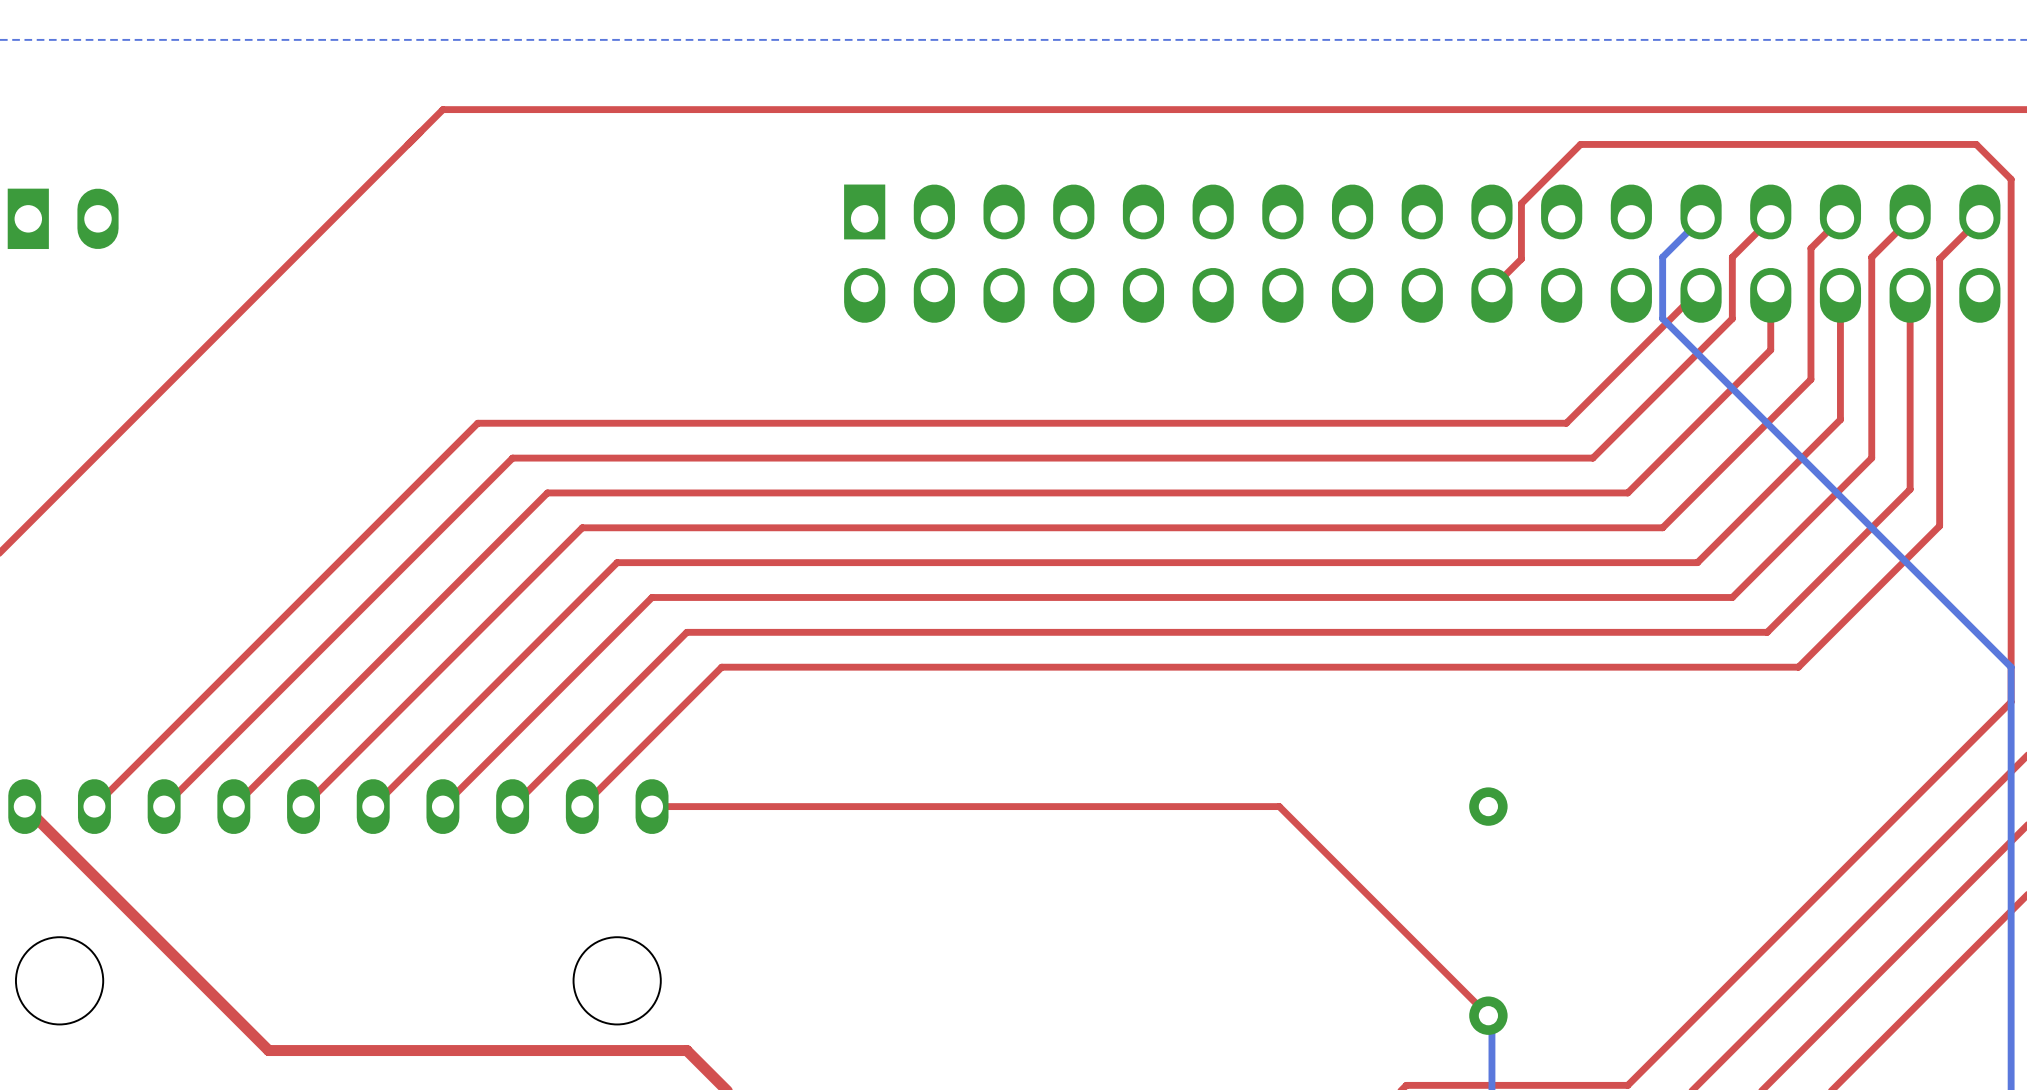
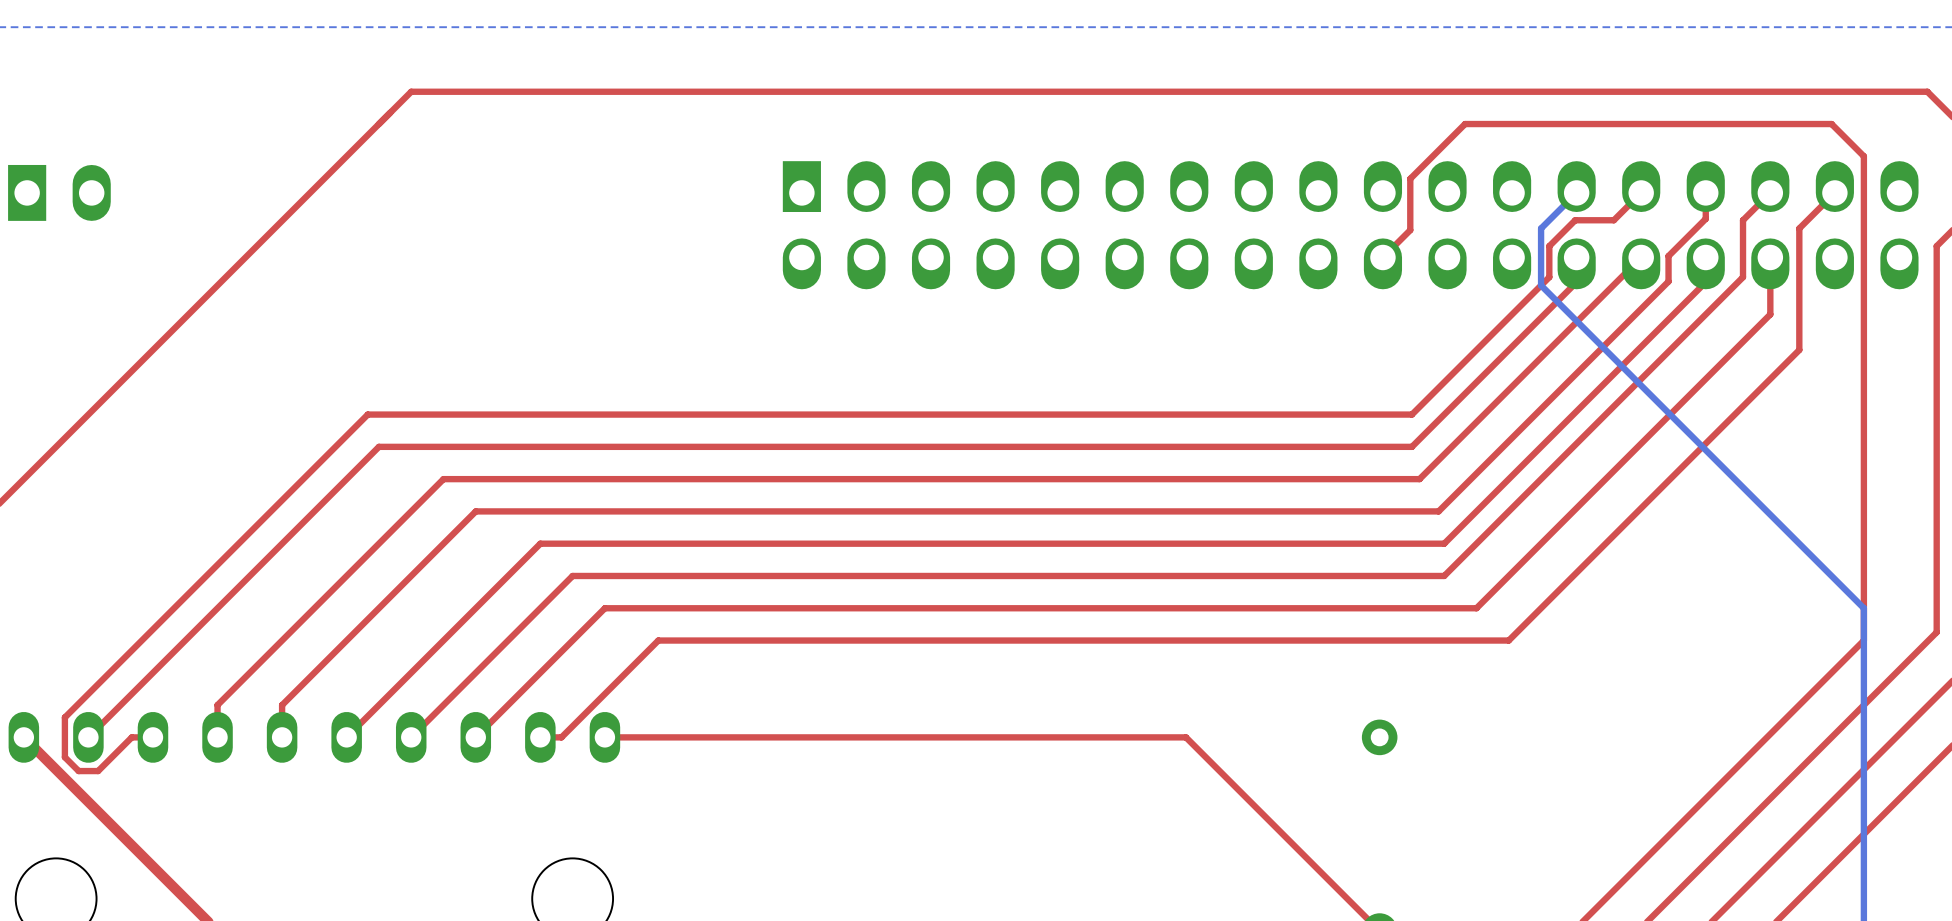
top track: (1840, 218) (1810, 248) (1810, 379) -> (1743, 220) (1743, 277) (1678, 341)
top track: none -> (1705, 192) (1705, 218) (1668, 256) (1668, 281) (1438, 511)
top track: (1741, 248) (1732, 257) (1732, 318) (1592, 458) (1523, 458) -> (1613, 220) (1575, 220) (1549, 246) (1549, 277) (1411, 414)
top track: (1880, 248) (1871, 257) (1871, 458) -> (1799, 228) (1799, 350) (1734, 414)
top track: (1941, 257) (1939, 259) (1939, 526) (1798, 667) (1592, 667) -> none
top track: (1701, 288) (1566, 423) (477, 423) (408, 492) -> (1576, 257) (1576, 282) (1411, 446)
top track: (1770, 288) (1770, 349) (1627, 492) (1523, 492) -> (1641, 257) (1419, 479)
top track: (1840, 315) (1840, 419) -> (1770, 314) (1705, 378)
top track: (1910, 349) (1910, 489) (1767, 632) (1558, 632) -> none
top track: (512, 458) (164, 806) -> (475, 414) (367, 414) (64, 717) (64, 757) (78, 771) (98, 771) (131, 737) (152, 737)
top track: (547, 492) (233, 806) -> (540, 479) (443, 479) (217, 705) (217, 737)
top track: none -> (508, 446) (378, 446)
top track: (582, 527) (303, 806) -> (572, 511) (475, 511) (282, 705) (282, 737)
top track: (1662, 527) (1531, 527) -> (1541, 479) (1444, 575)
top track: (617, 562) (582, 597) -> (604, 543) (540, 543)
top track: (1697, 562) (1552, 562) -> (1573, 511) (1476, 608)
top track: (652, 597) (617, 632) -> (637, 575) (572, 575)
top track: (1732, 597) (1558, 597) -> (1705, 282) (1444, 543)
top track: (686, 632) (652, 667) -> (669, 608) (604, 608)
top track: (721, 667) (582, 806) -> (1605, 543) (1508, 640) (658, 640) (561, 737) (540, 737)

